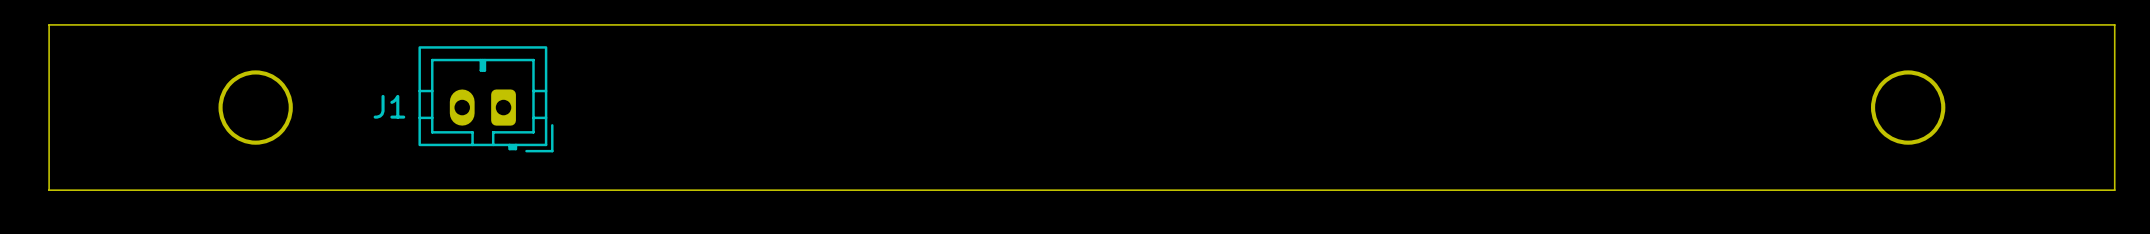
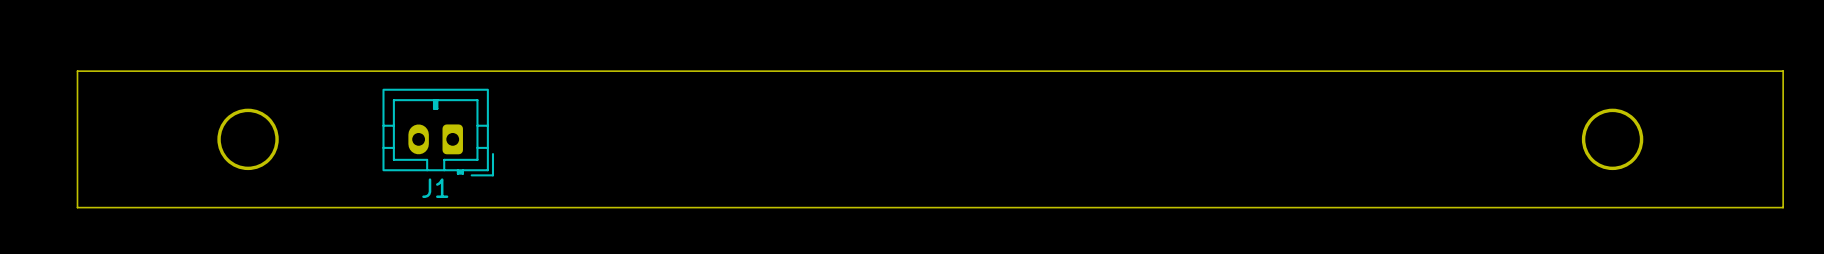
J1 name position: J1 (389, 106) -> J1 (435, 188)

